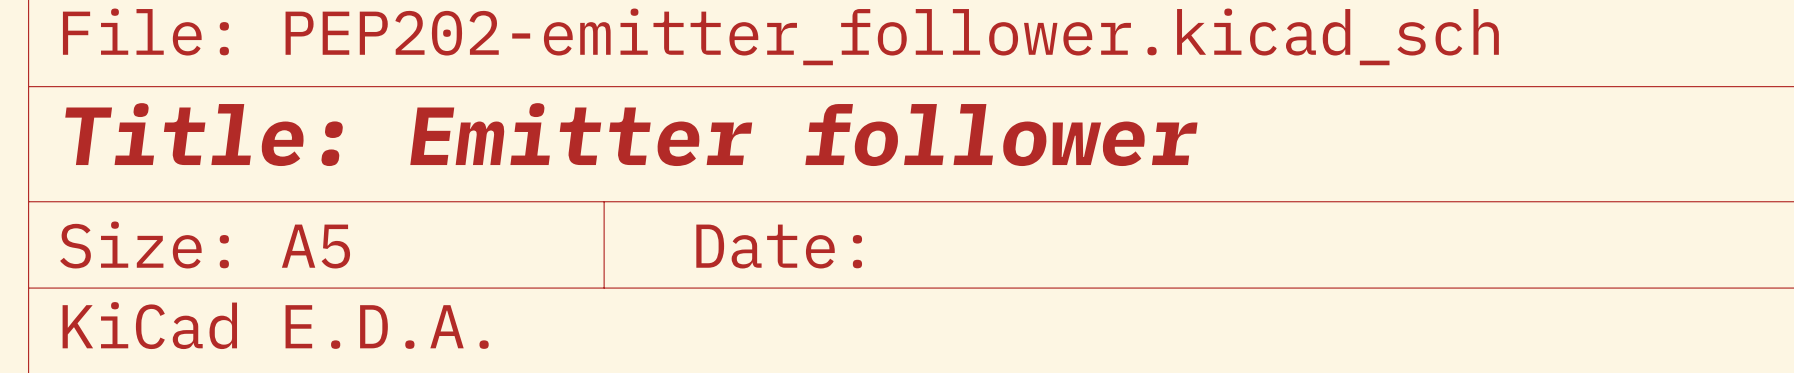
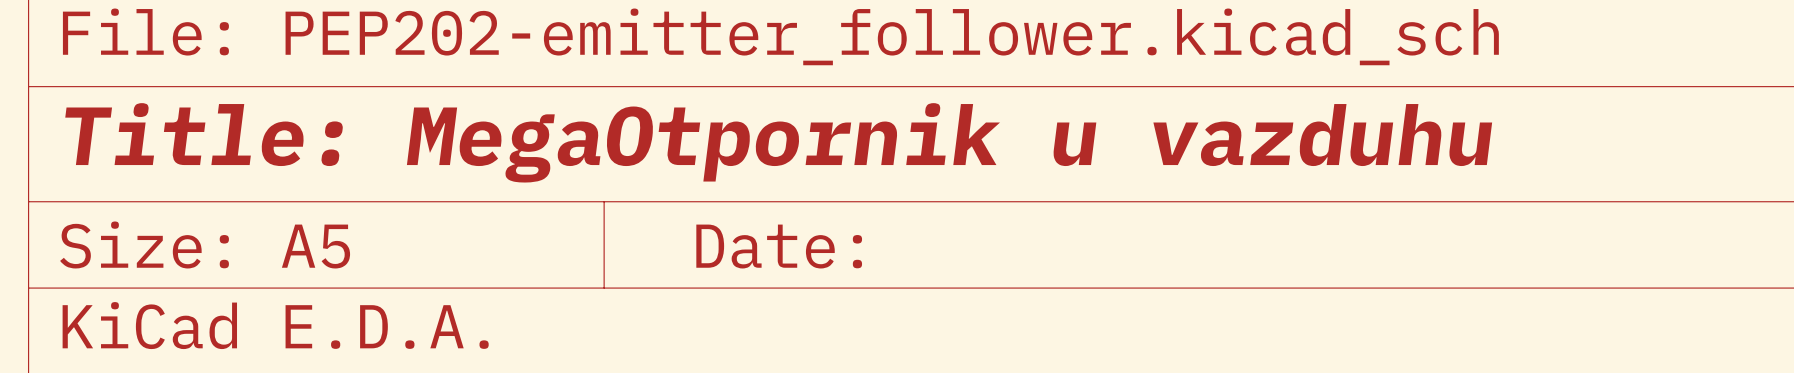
title block: Title: Emitter follower (631, 134) -> Title: MegaOtpornik u vazduhu (778, 142)

